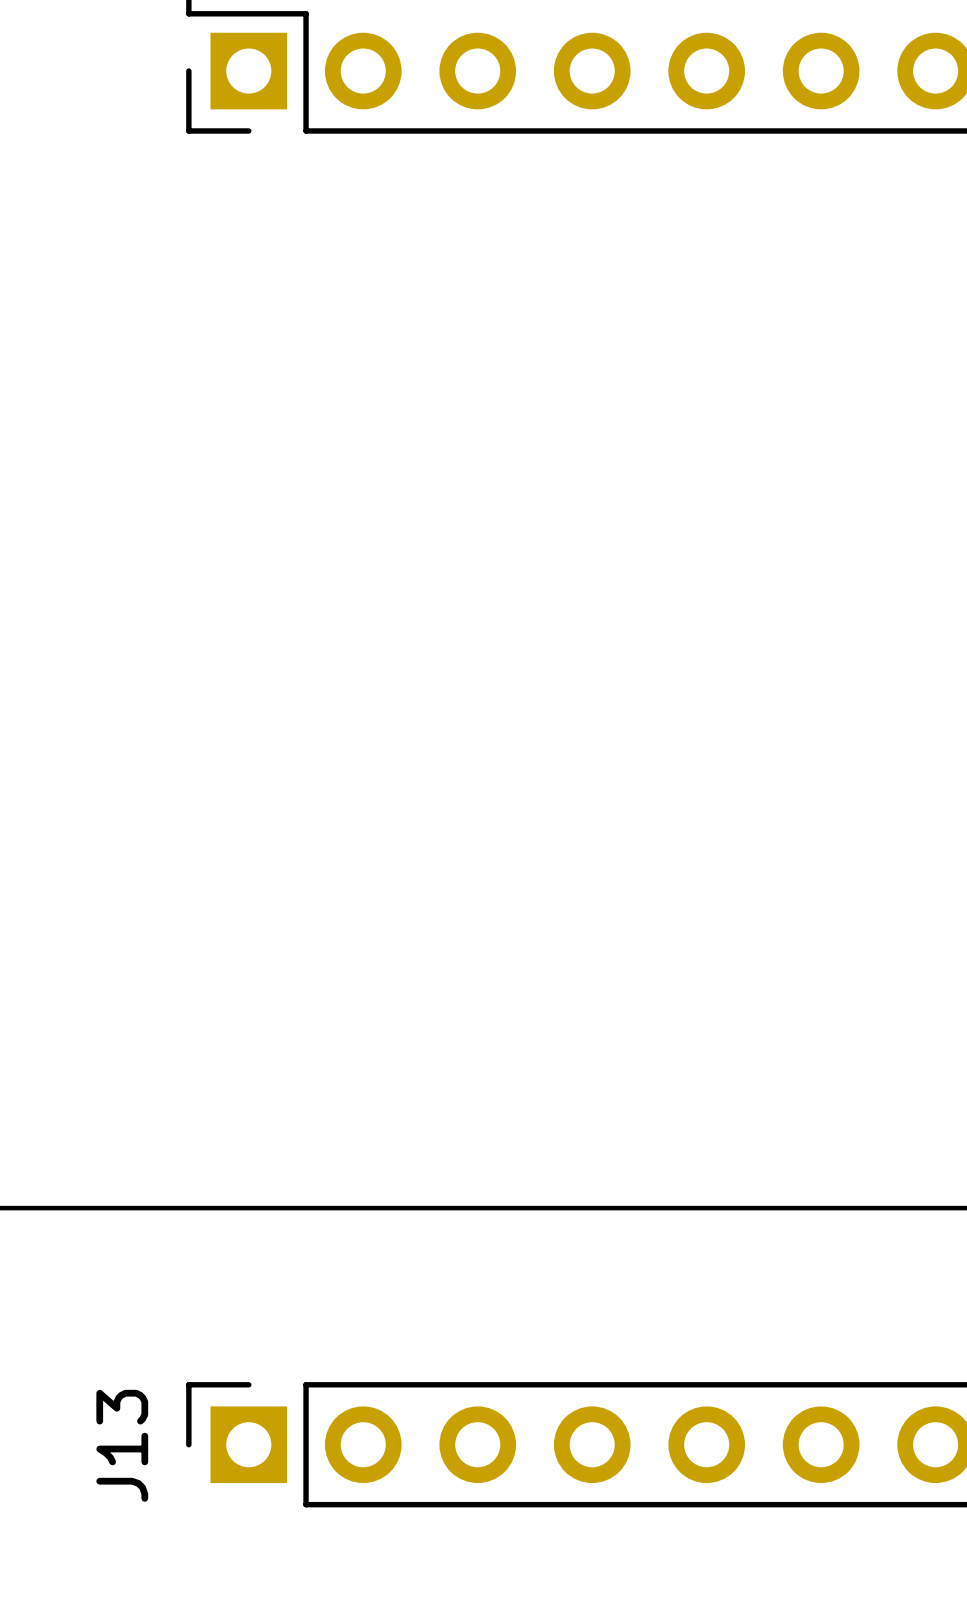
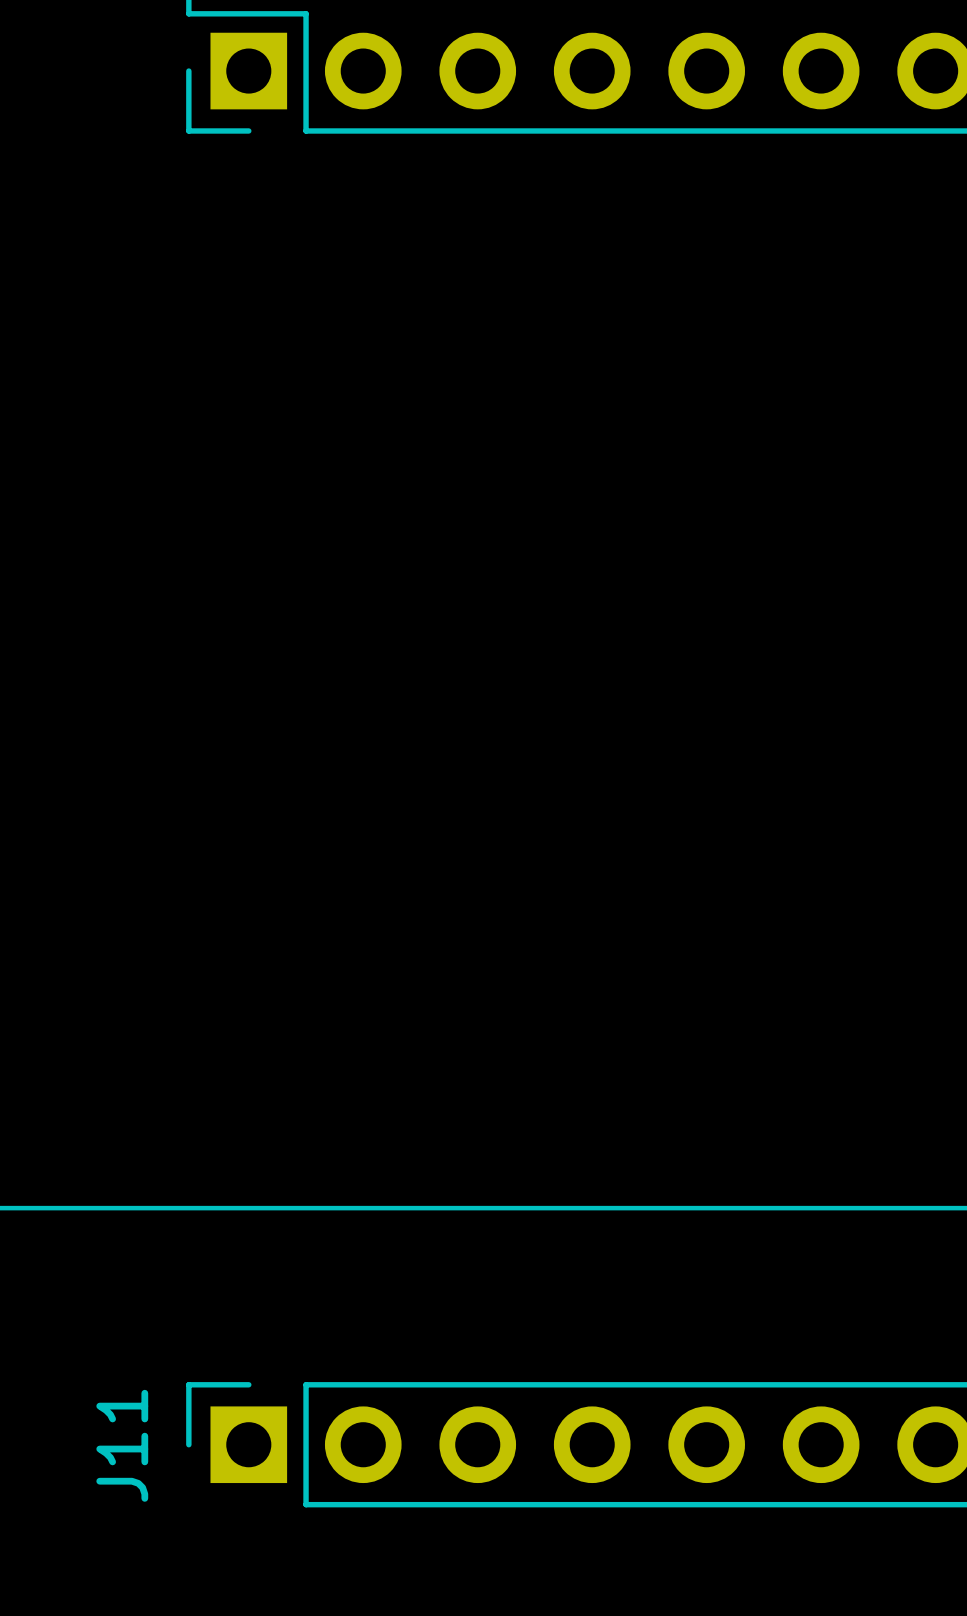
J13 name: J13 (122, 1445) -> J11 (122, 1445)

